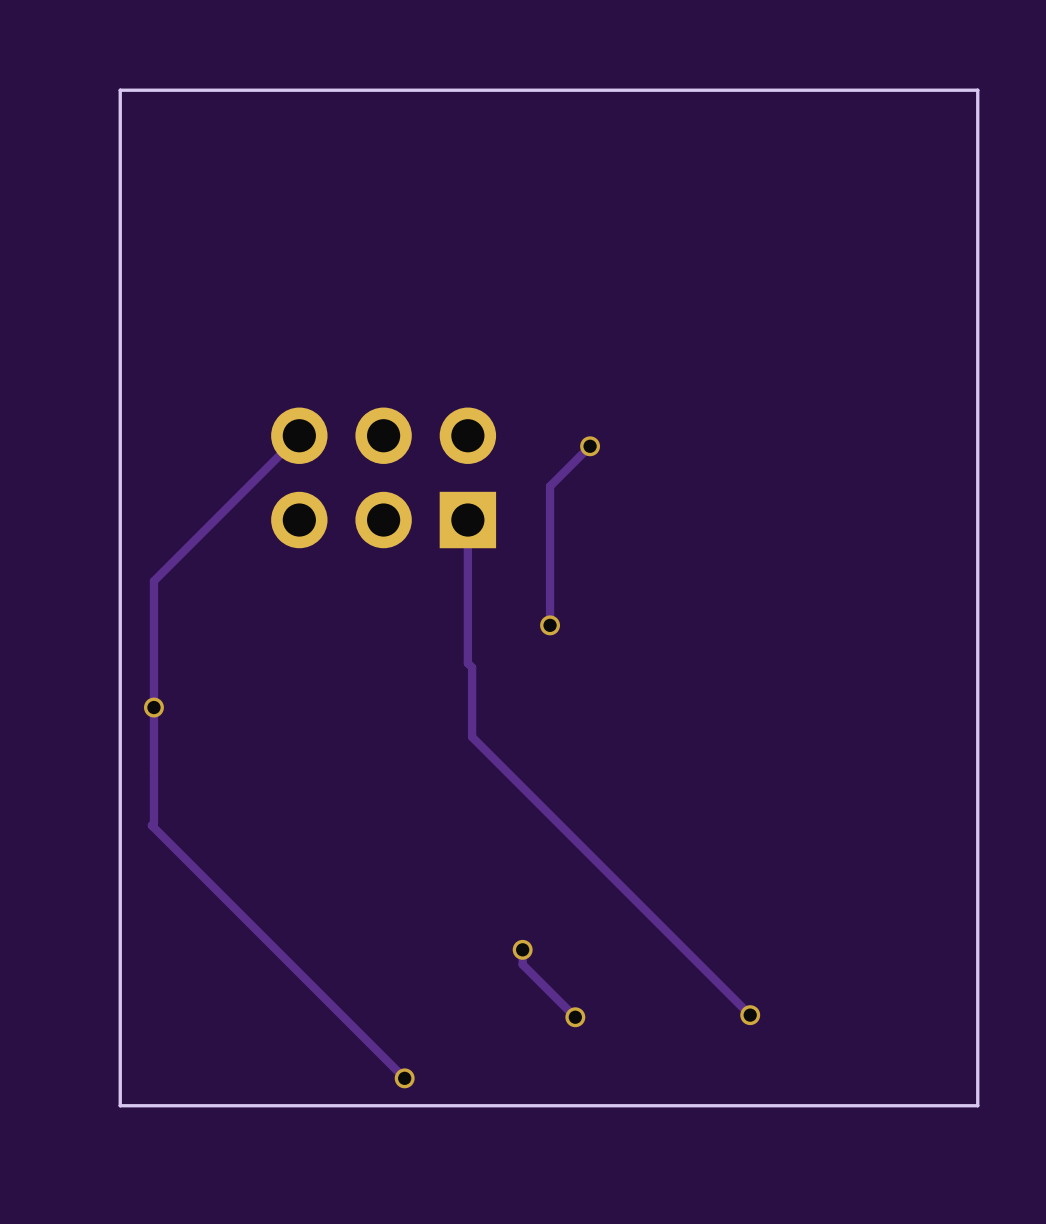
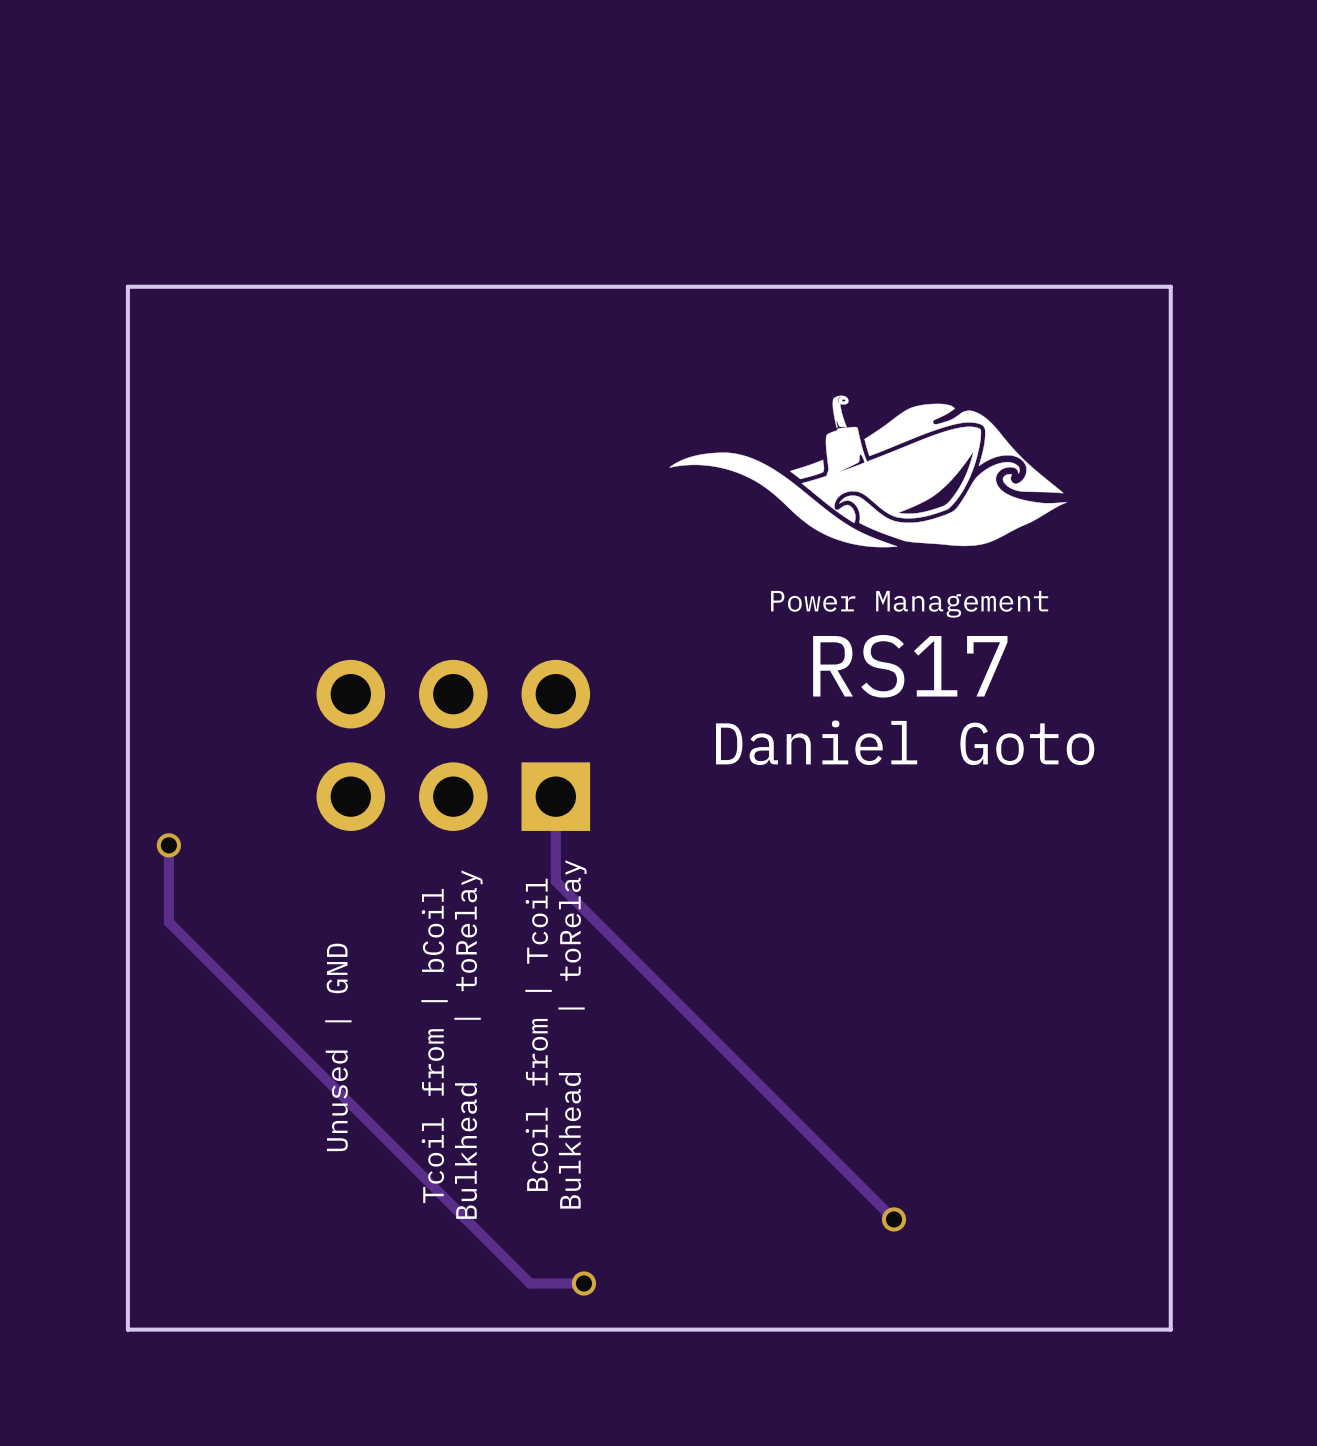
board edge: (977, 248) (977, 90) (120, 90) (120, 248) -> (1170, 286) (127, 286)
drawing: none -> [669, 395, 1067, 548]
track: (299, 435) (153, 581) (153, 707) -> none
track: (590, 446) (550, 486) (550, 625) -> none
via: (590, 446) -> none
part position: (383, 477) -> (453, 745)
text: none -> Power Management (909, 604)
track: (467, 520) (467, 663) (472, 667) -> none
text: none -> RS17 (910, 666)
text: none -> Daniel Goto (905, 742)
via: (550, 625) -> none
track: (153, 770) (153, 823) (151, 825) (404, 1078) -> (168, 922) (530, 1283) (583, 1283)
text: none -> Bcoil from | Tcoil (538, 1034)
text: none -> Bulkhead | toRelay (572, 1034)
text: none -> Bulkhead | toRelay (468, 1044)
text: none -> Tcoil from | bCoil (434, 1046)
text: none -> Unused | GND (338, 1047)
track: (522, 949) (522, 964) (575, 1017) -> none
via: (522, 949) -> none
via: (575, 1017) -> none
via: none -> (583, 1283)
via: (404, 1078) -> none

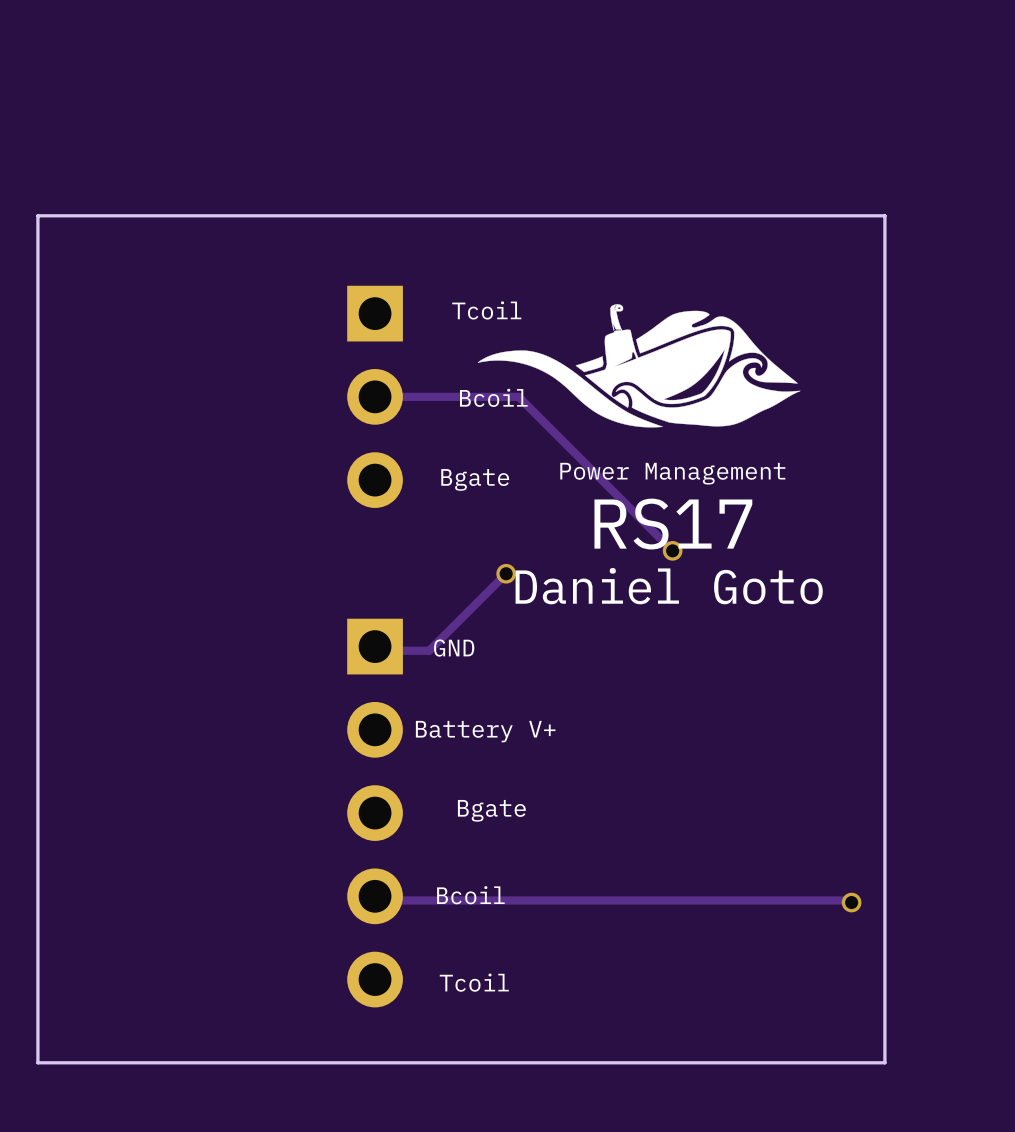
text: none -> Tcoil (486, 310)
track: none -> (375, 396) (518, 396) (672, 550)
part: none -> (375, 396)
text: none -> Bcoil (493, 397)
text: none -> Bgate (475, 479)
via: none -> (672, 550)
track: none -> (506, 573) (429, 650) (370, 650)
via: none -> (506, 573)
part: (453, 745) -> none
track: (555, 796) (555, 881) (894, 1219) -> none
text: none -> GND (454, 648)
track: (168, 845) (168, 922) (530, 1283) (583, 1283) -> none
via: (168, 845) -> none
text: none -> Battery V+ (485, 731)
text: none -> Bgate (491, 810)
part: none -> (375, 813)
text: Bcoil from | Tcoil (538, 1034) -> none
text: Bulkhead | toRelay (572, 1034) -> none
text: Bulkhead | toRelay (468, 1044) -> none
text: Tcoil from | bCoil (434, 1046) -> none
text: Unused | GND (338, 1047) -> none
text: none -> Bcoil (470, 895)
track: none -> (370, 900) (849, 900) (851, 902)
via: none -> (851, 902)
via: (894, 1219) -> none
text: none -> Tcoil (474, 982)
via: (583, 1283) -> none

